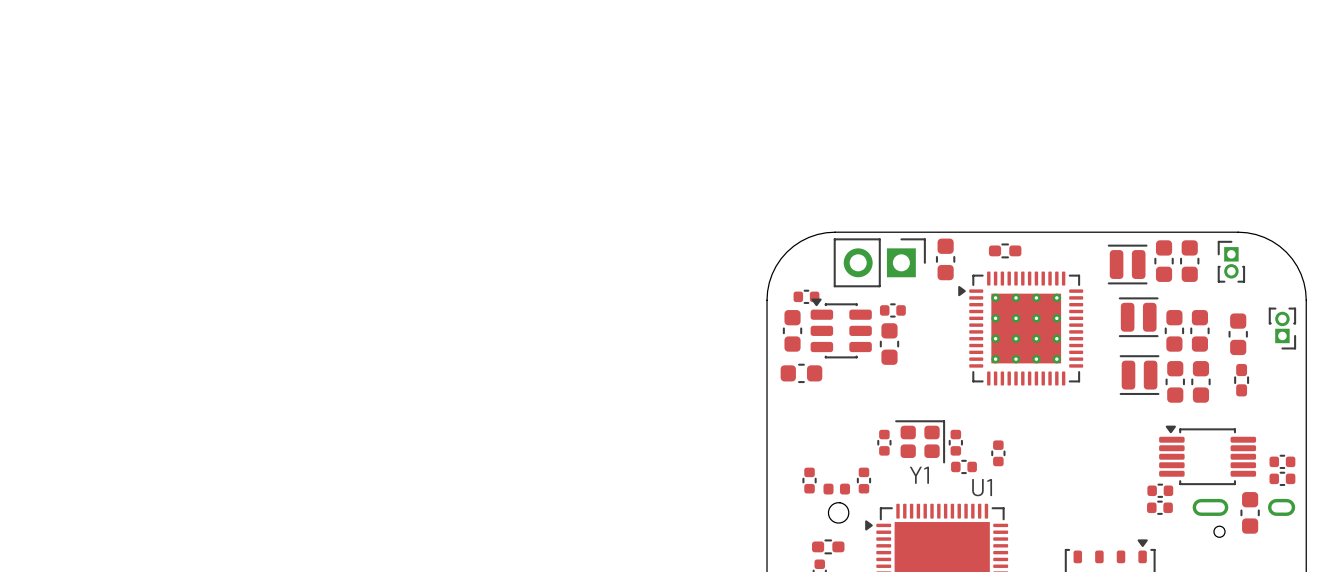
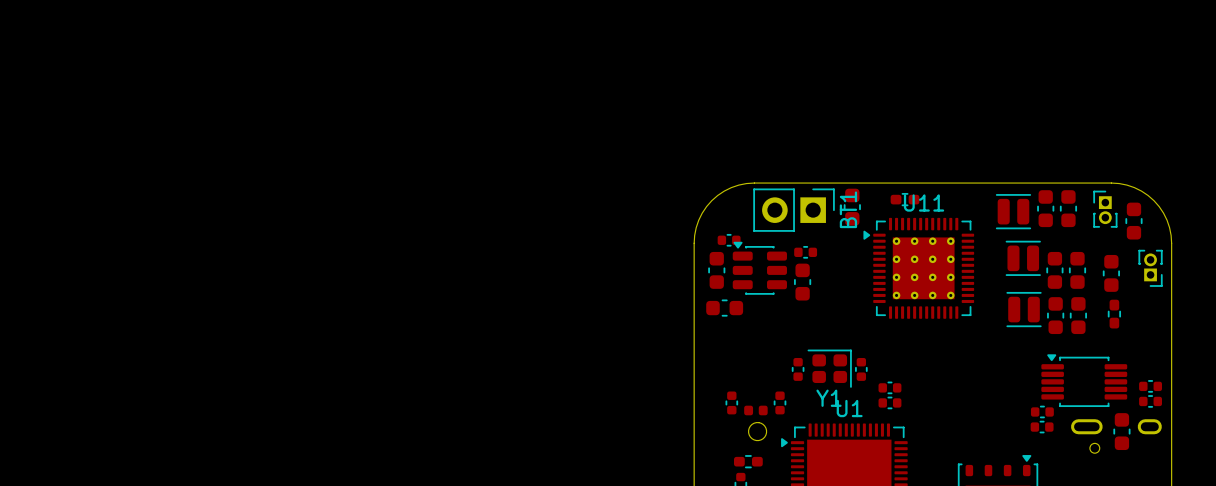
U11 name: none -> U11 (924, 203)
BT1 name: none -> BT1 (848, 209)
part: none -> (1133, 221)
part: (998, 453) -> none
part: none -> (889, 387)
part: (963, 466) -> none
part: none -> (889, 402)
U1 name position: U1 (982, 487) -> U1 (849, 408)

